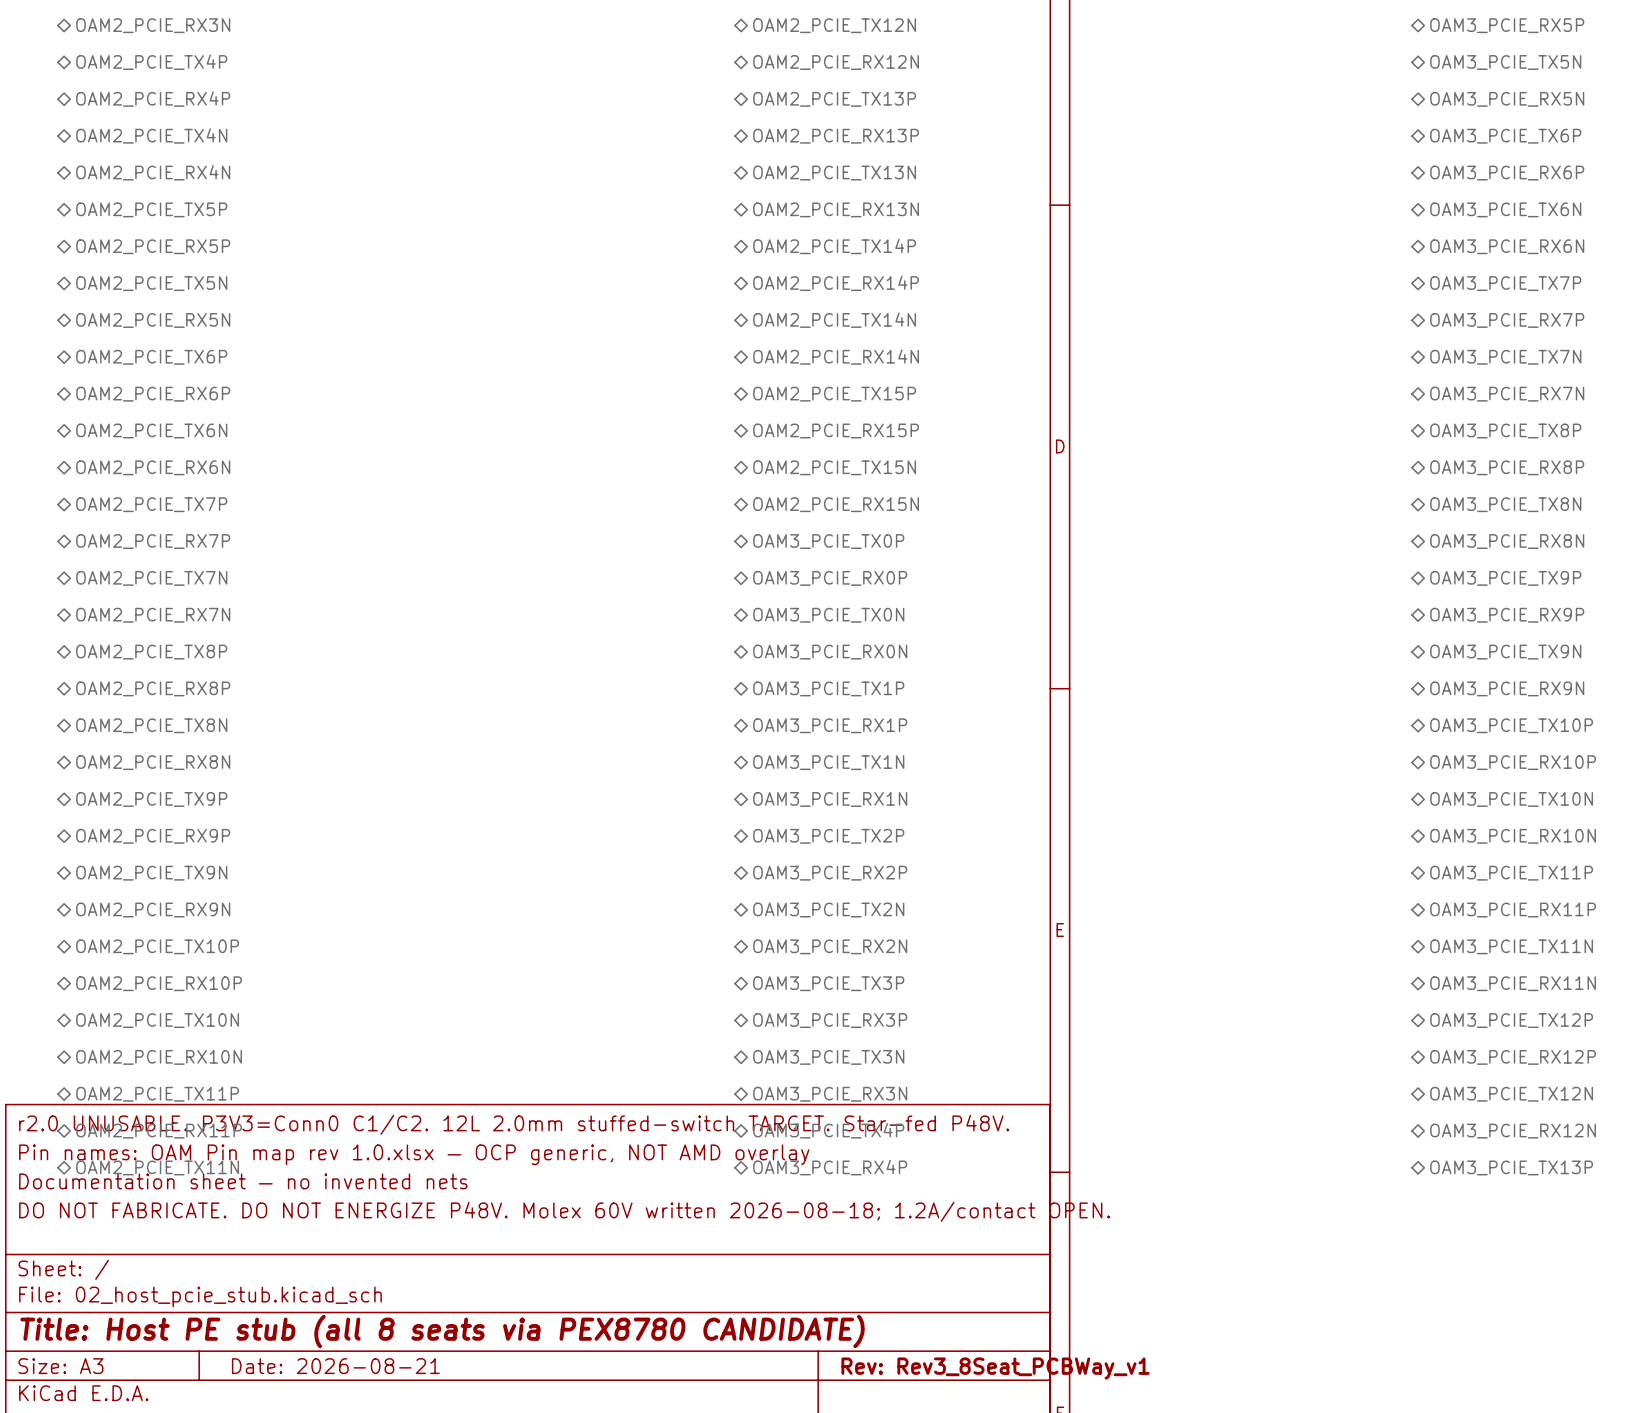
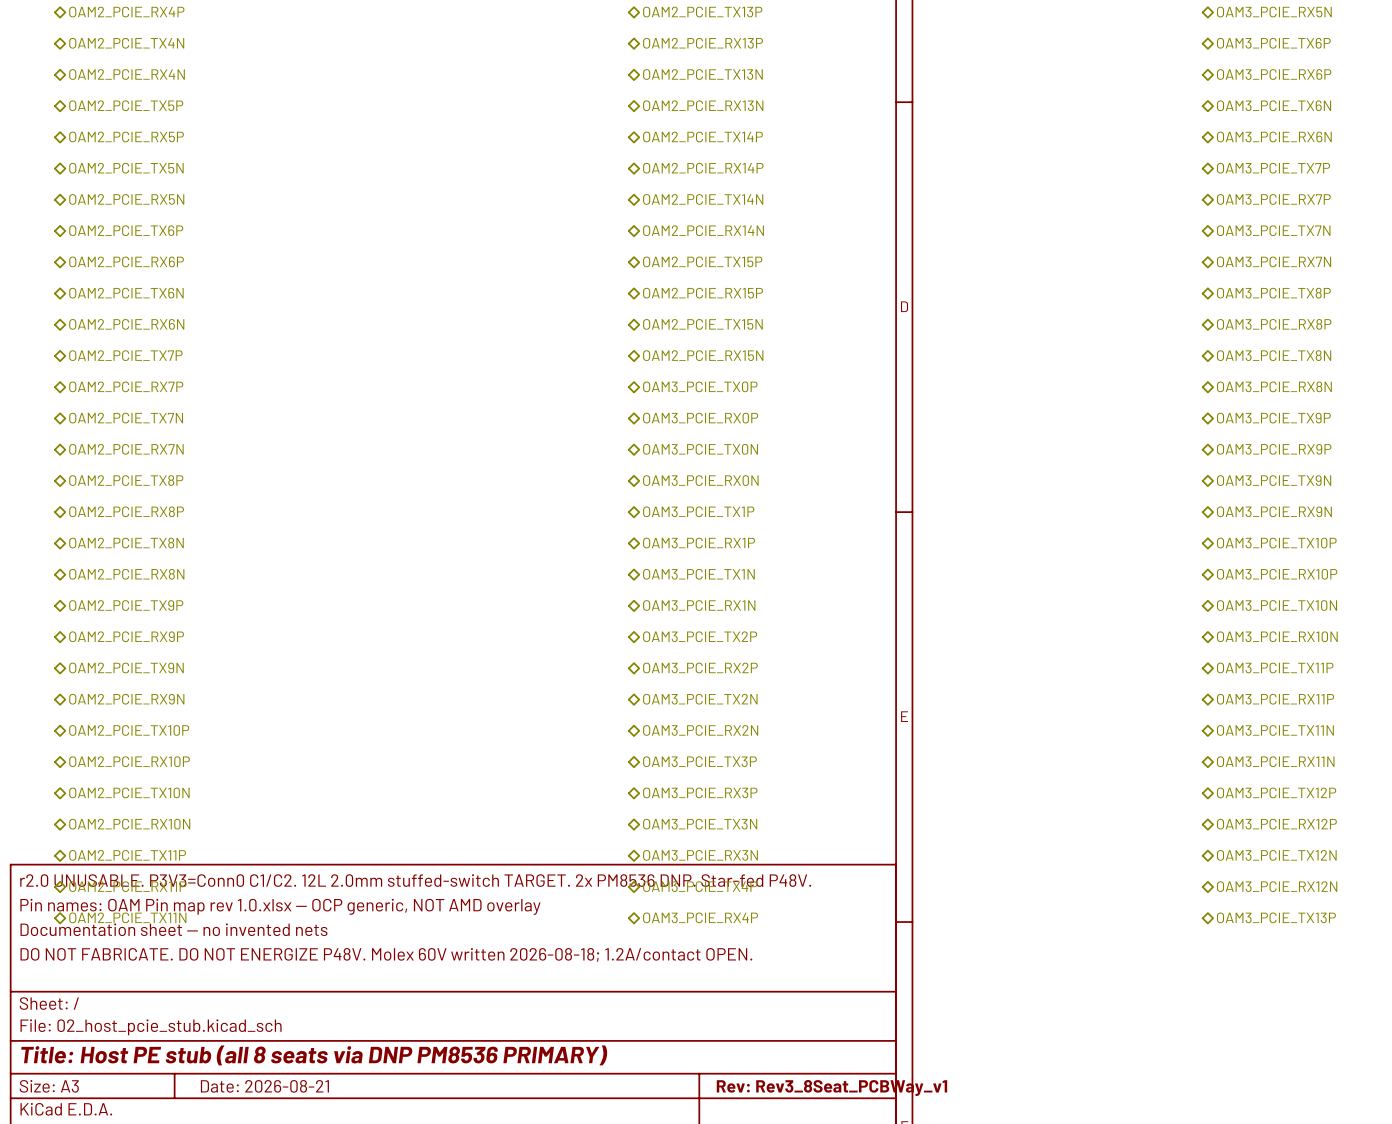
title block: r2.0 UNUSABLE. P3V3=Conn0 C1/C2. 12L 2.0mm stuffed-switch TARGET. Star-fed P48V. (514, 1124) -> r2.0 UNUSABLE. P3V3=Conn0 C1/C2. 12L 2.0mm stuffed-switch TARGET. 2x PM8536 DNP. Star-fed P48V. (415, 880)
title block: Title: Host PE stub (all 8 seats via PEX8780 CANDIDATE) (442, 1331) -> Title: Host PE stub (all 8 seats via DNP PM8536 PRIMARY) (314, 1055)

